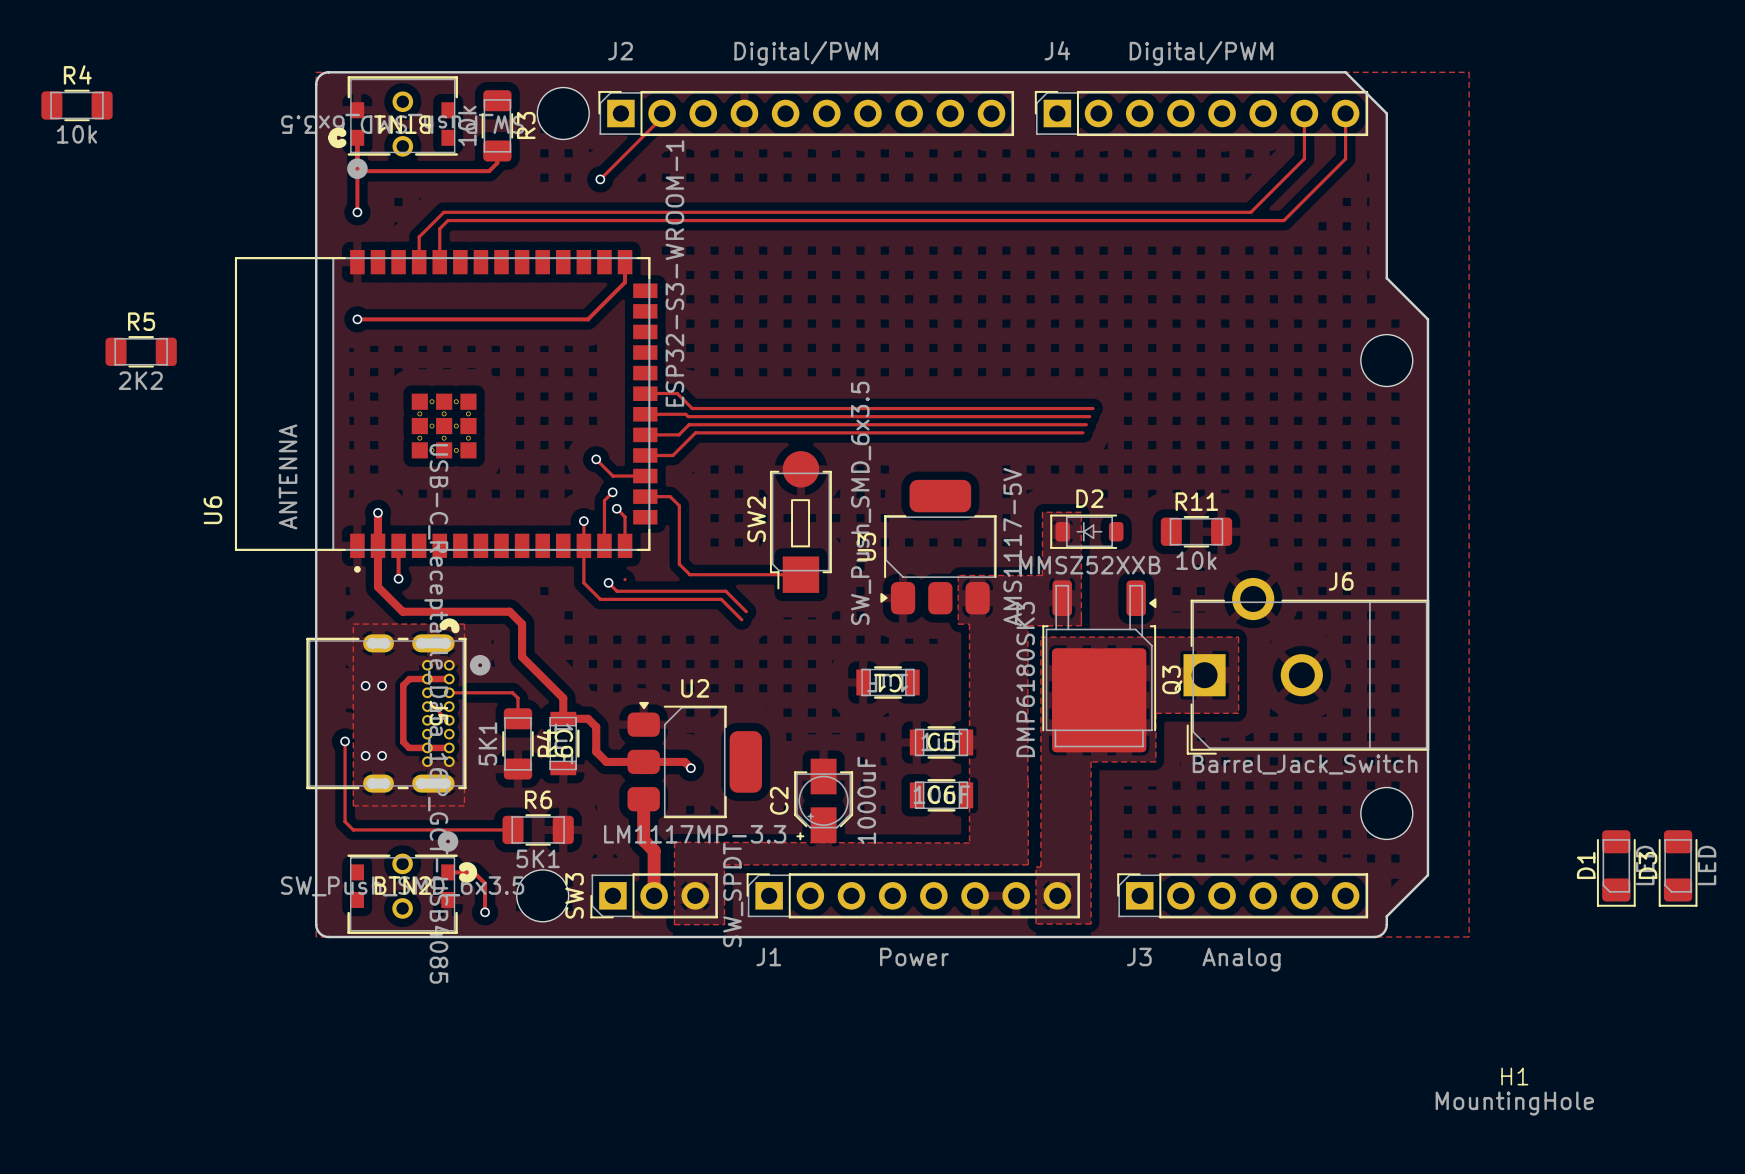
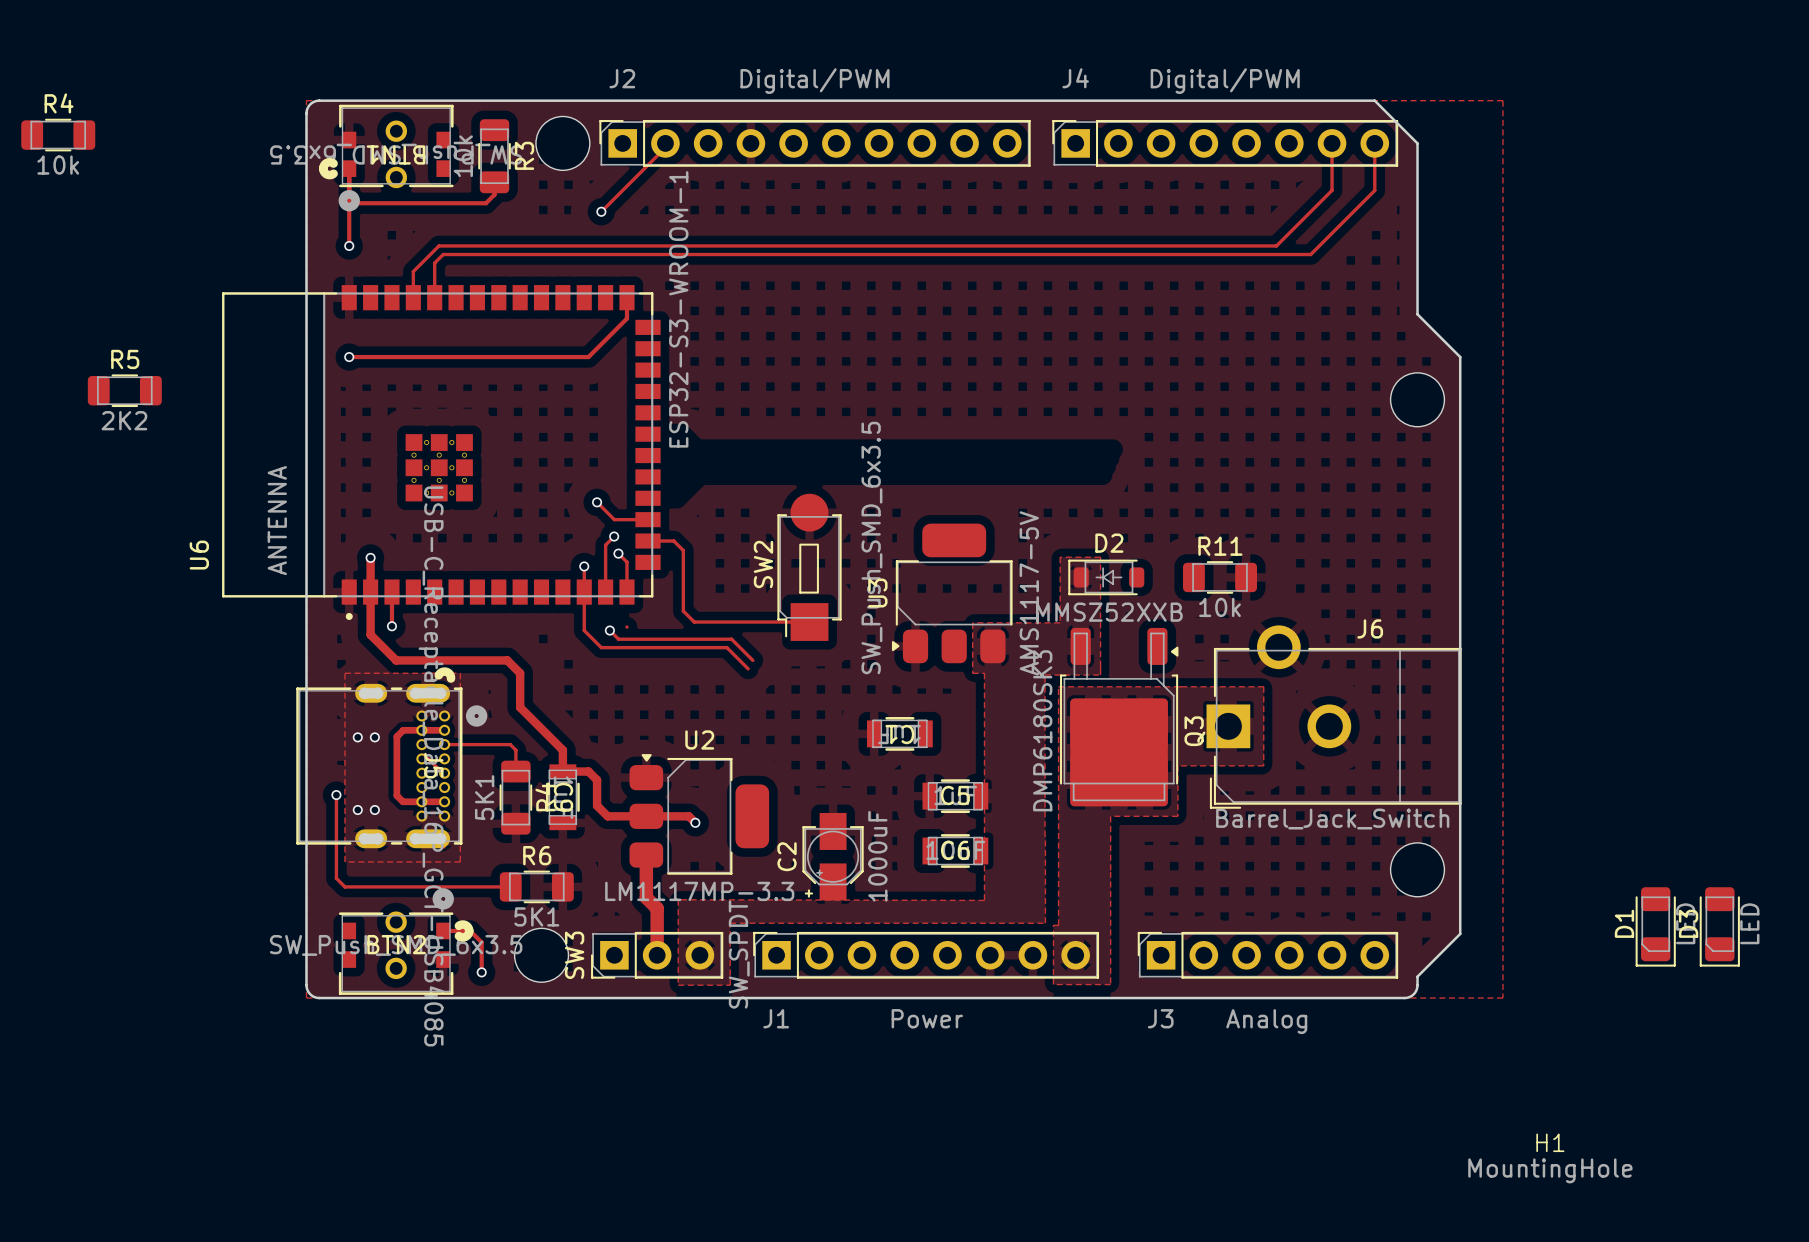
track: (645, 393) (677, 393) (692, 408) (1093, 408) -> none
track: (645, 414) (685, 414) (688, 416) (1089, 416) -> none
track: (1086, 424) (689, 424) (678, 434) (645, 434) -> none
track: (1082, 432) (695, 432) (672, 455) (645, 455) -> none

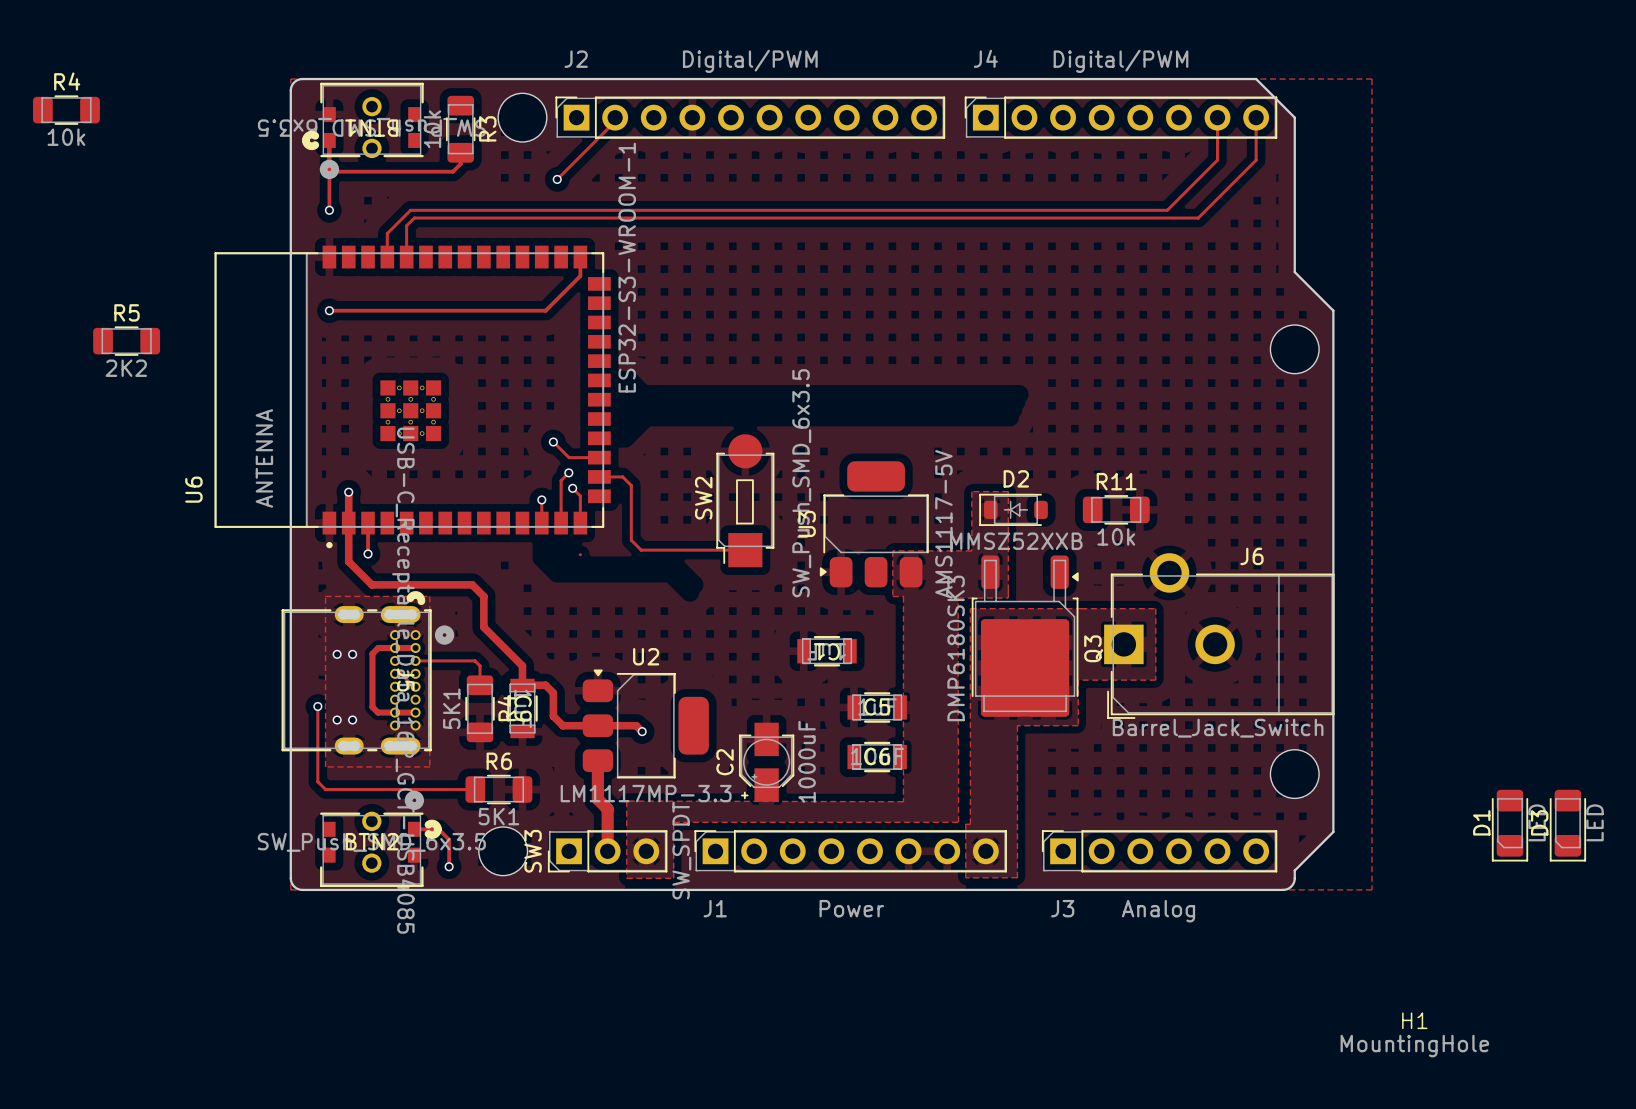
track: (584, 592) (584, 630) (601, 647) (726, 647) (748, 668) -> none
track: (609, 630) (618, 639) (731, 639) (752, 660) -> none
via: (609, 630) -> none

